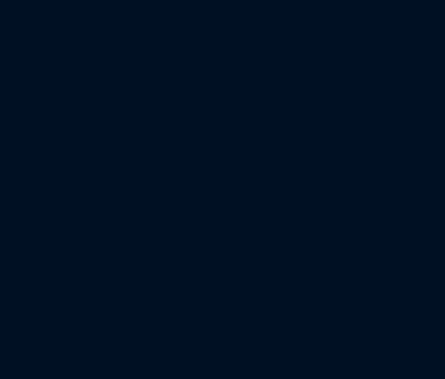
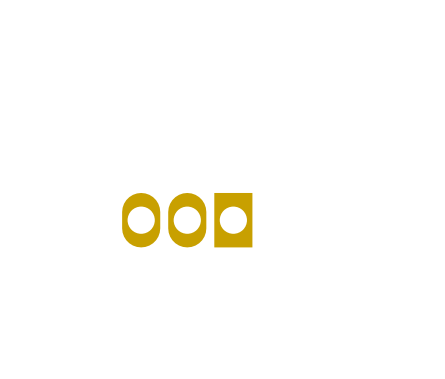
part: none -> (187, 220)

